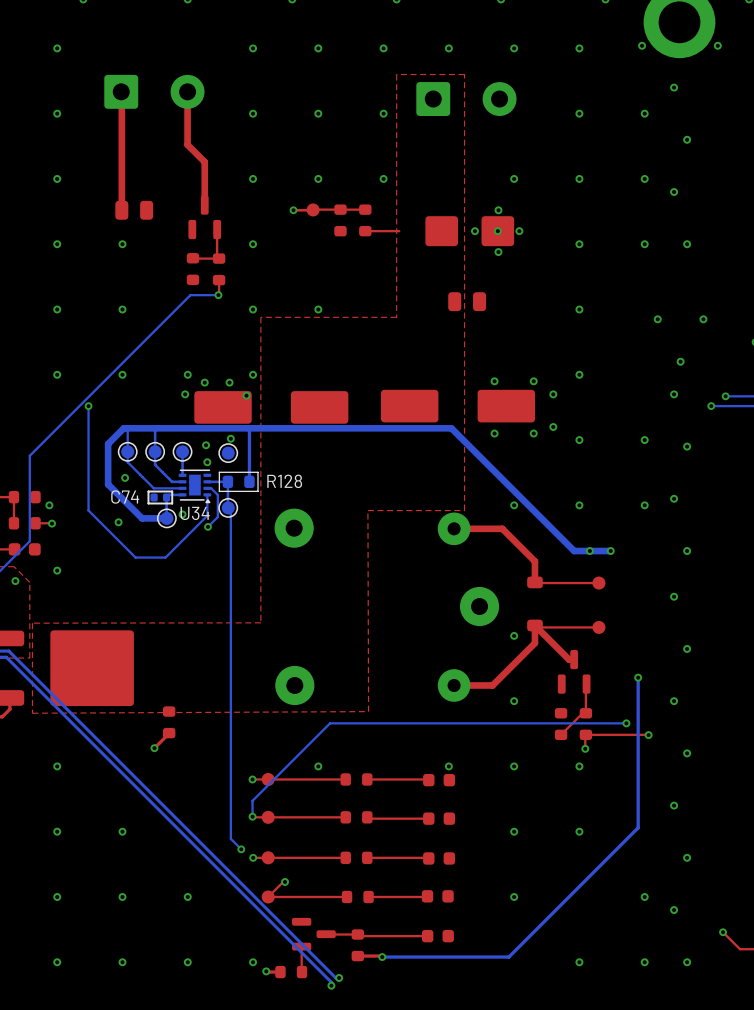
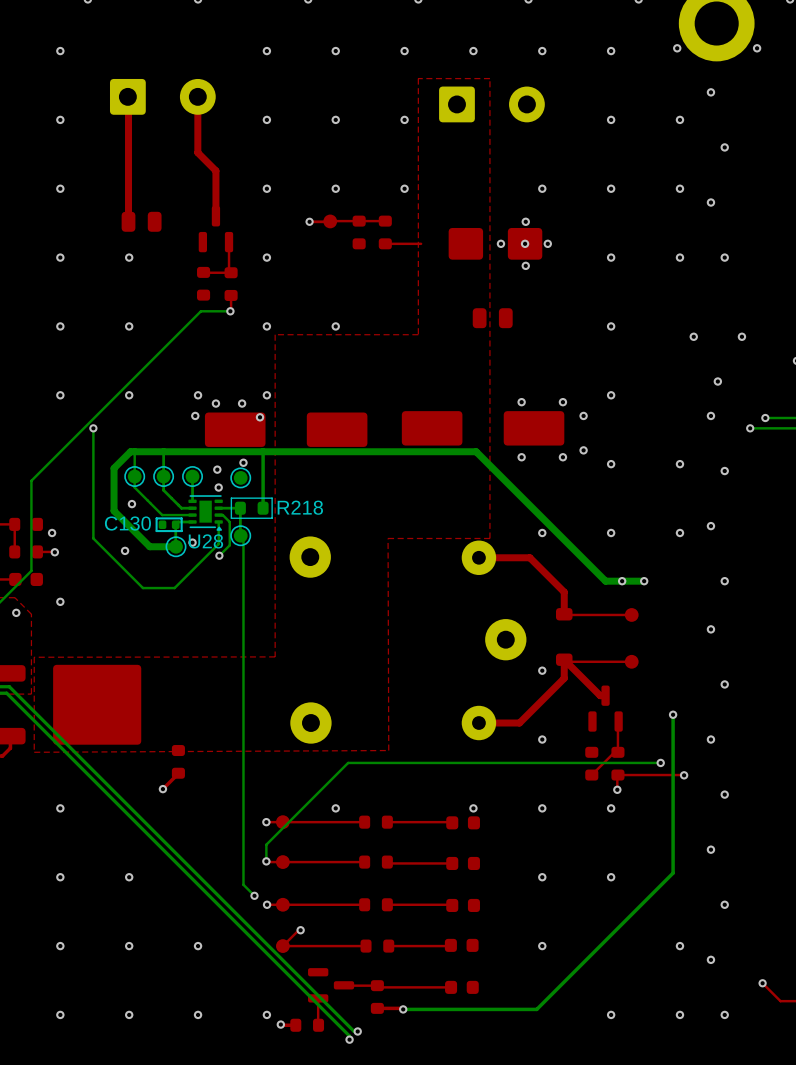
R128 name: R128 (284, 481) -> R218 (300, 507)
C74 name: C74 (125, 497) -> C130 (127, 523)
U34 name: U34 (195, 513) -> U28 (205, 541)

